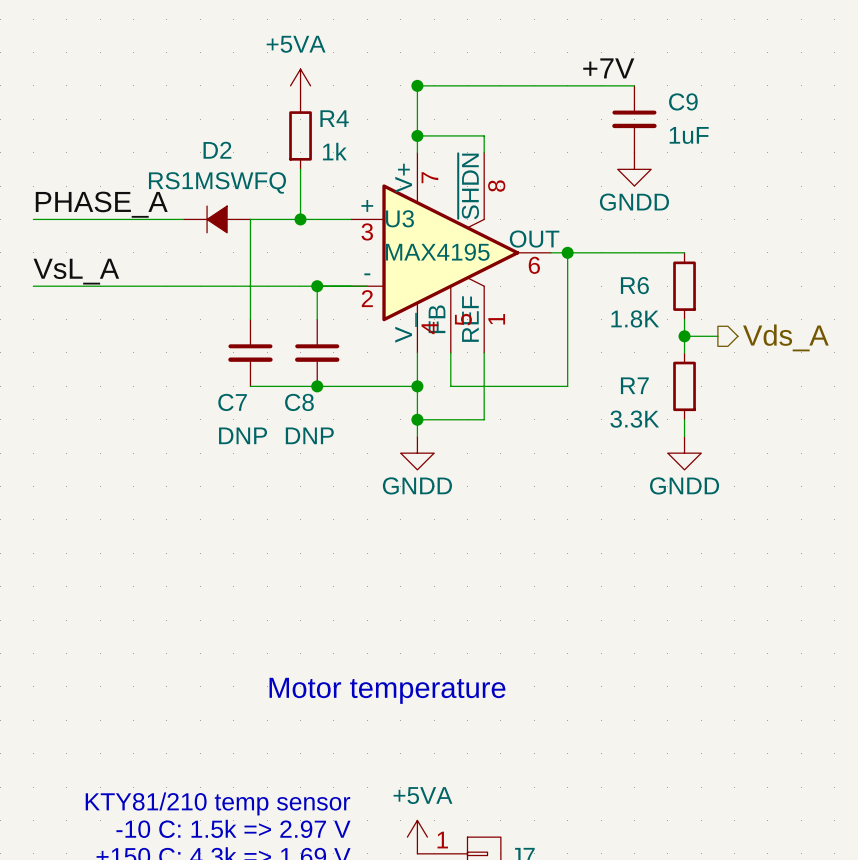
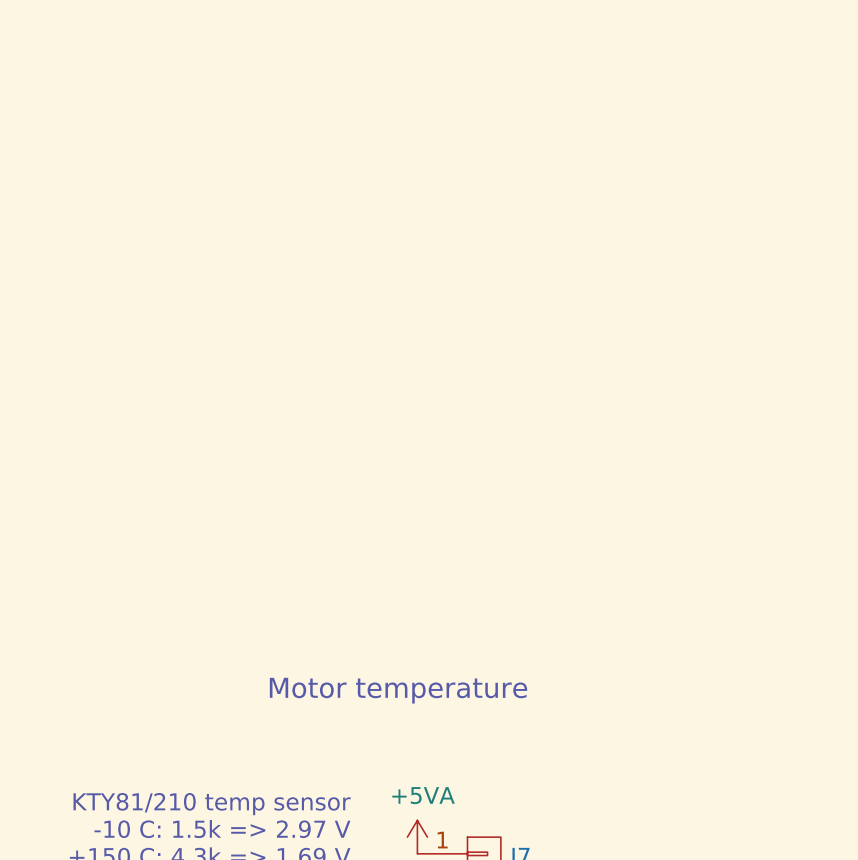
label: +7V (608, 68) -> none
power symbol: +5VA (300, 85) -> none
junction: (417, 85) -> none
wire: (634, 85) (417, 85) (417, 152) -> none
C9: 1uF (634, 119) -> none
R4: 1k (300, 135) -> none
wire: (417, 135) (484, 135) (484, 152) -> none
junction: (417, 135) -> none
wire: (300, 169) (300, 219) -> none
power symbol: GNDD (634, 169) -> none
label: PHASE_A (101, 204) -> none
wire: (33, 219) (183, 219) -> none
D2: RS1MSWFQ (217, 219) -> none
junction: (300, 219) -> none
wire: (350, 219) (250, 219) (250, 319) -> none
U3: MAX4195 (450, 252) -> none
wire: (550, 252) (684, 252) -> none
wire: (567, 252) (567, 386) (450, 386) (450, 352) -> none
junction: (567, 252) -> none
label: VsL_A (76, 271) -> none
wire: (33, 286) (367, 286) -> none
wire: (317, 286) (317, 319) -> none
junction: (317, 286) -> none
R6: 1.8K (684, 286) -> none
wire: (684, 319) (684, 352) -> none
wire: (684, 336) (717, 336) -> none
junction: (684, 336) -> none
hierarchical label: Vds_A (785, 337) -> none
C7: DNP (250, 352) -> none
C8: DNP (317, 352) -> none
wire: (417, 352) (417, 436) -> none
wire: (484, 352) (484, 419) (417, 419) -> none
wire: (250, 386) (417, 386) -> none
junction: (317, 386) -> none
junction: (417, 386) -> none
R7: 3.3K (684, 386) -> none
junction: (417, 419) -> none
wire: (684, 419) (684, 436) -> none
power symbol: GNDD (417, 453) -> none
power symbol: GNDD (684, 453) -> none

